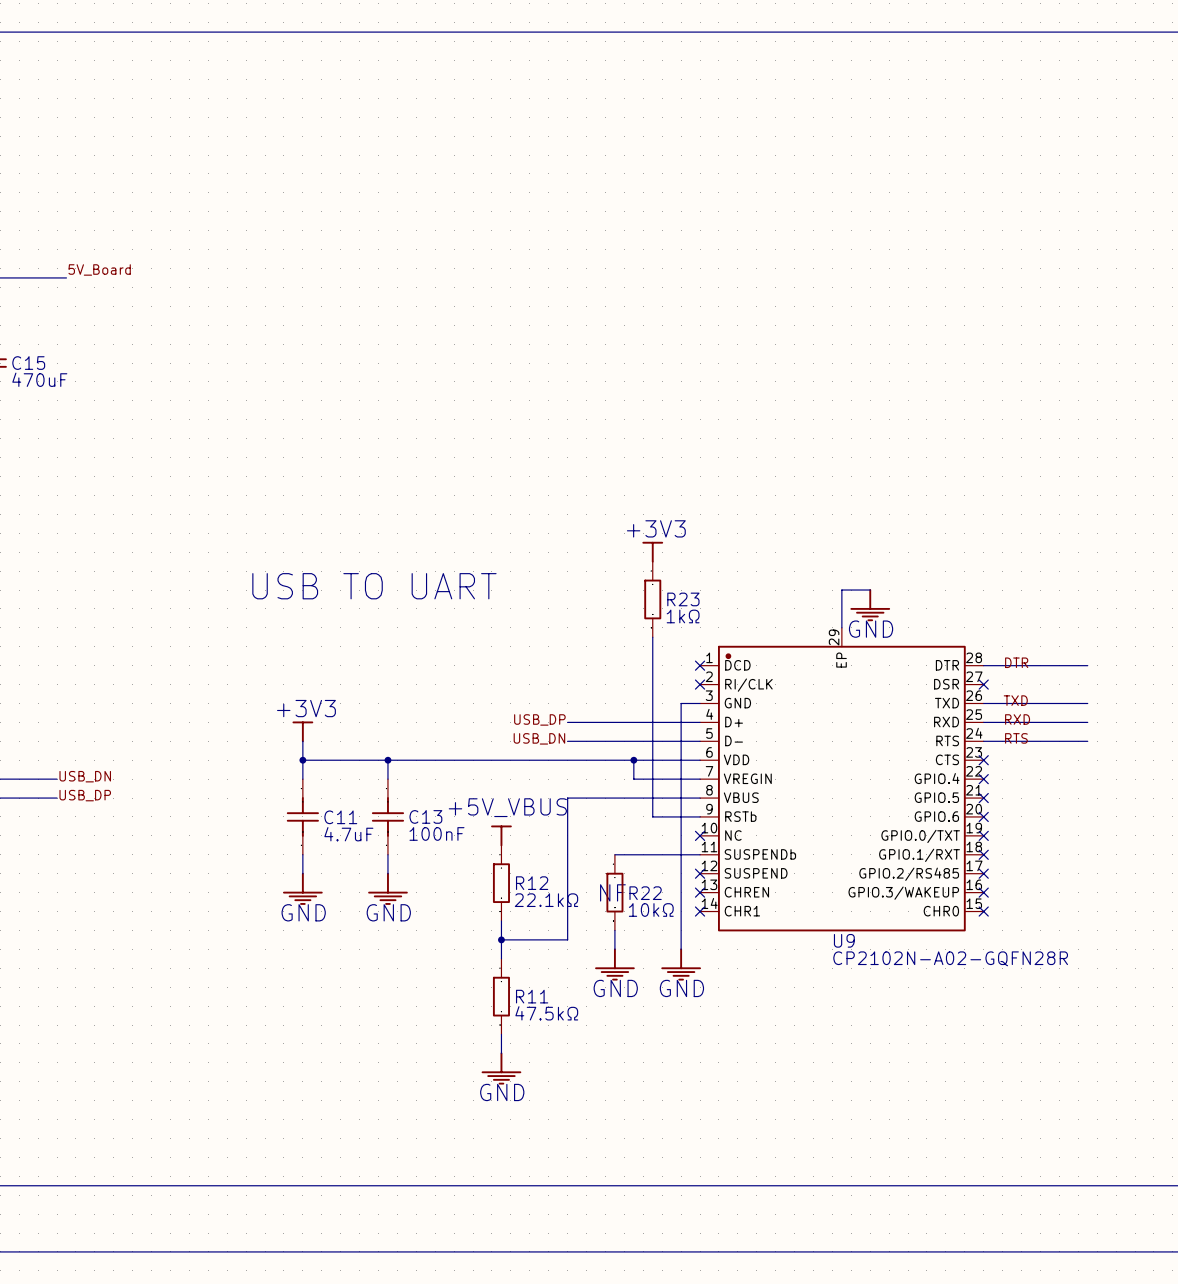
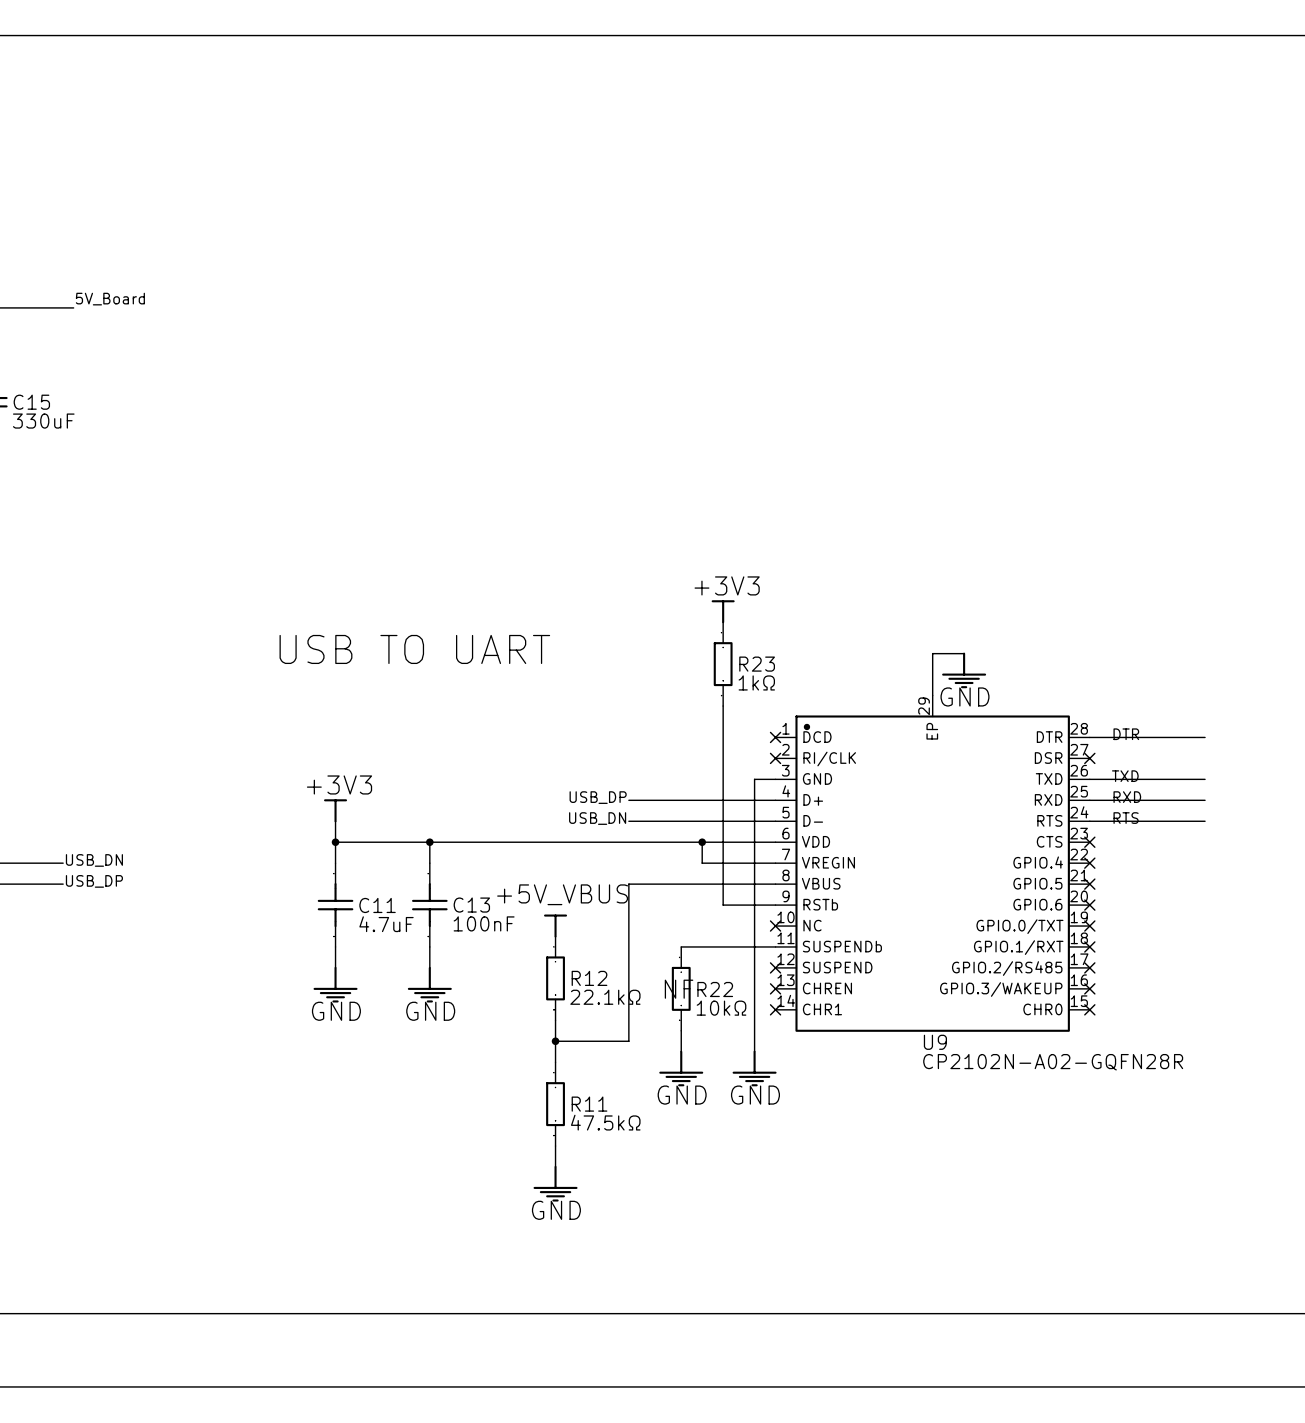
C15 value: 470uF (39, 379) -> 330uF (43, 421)

